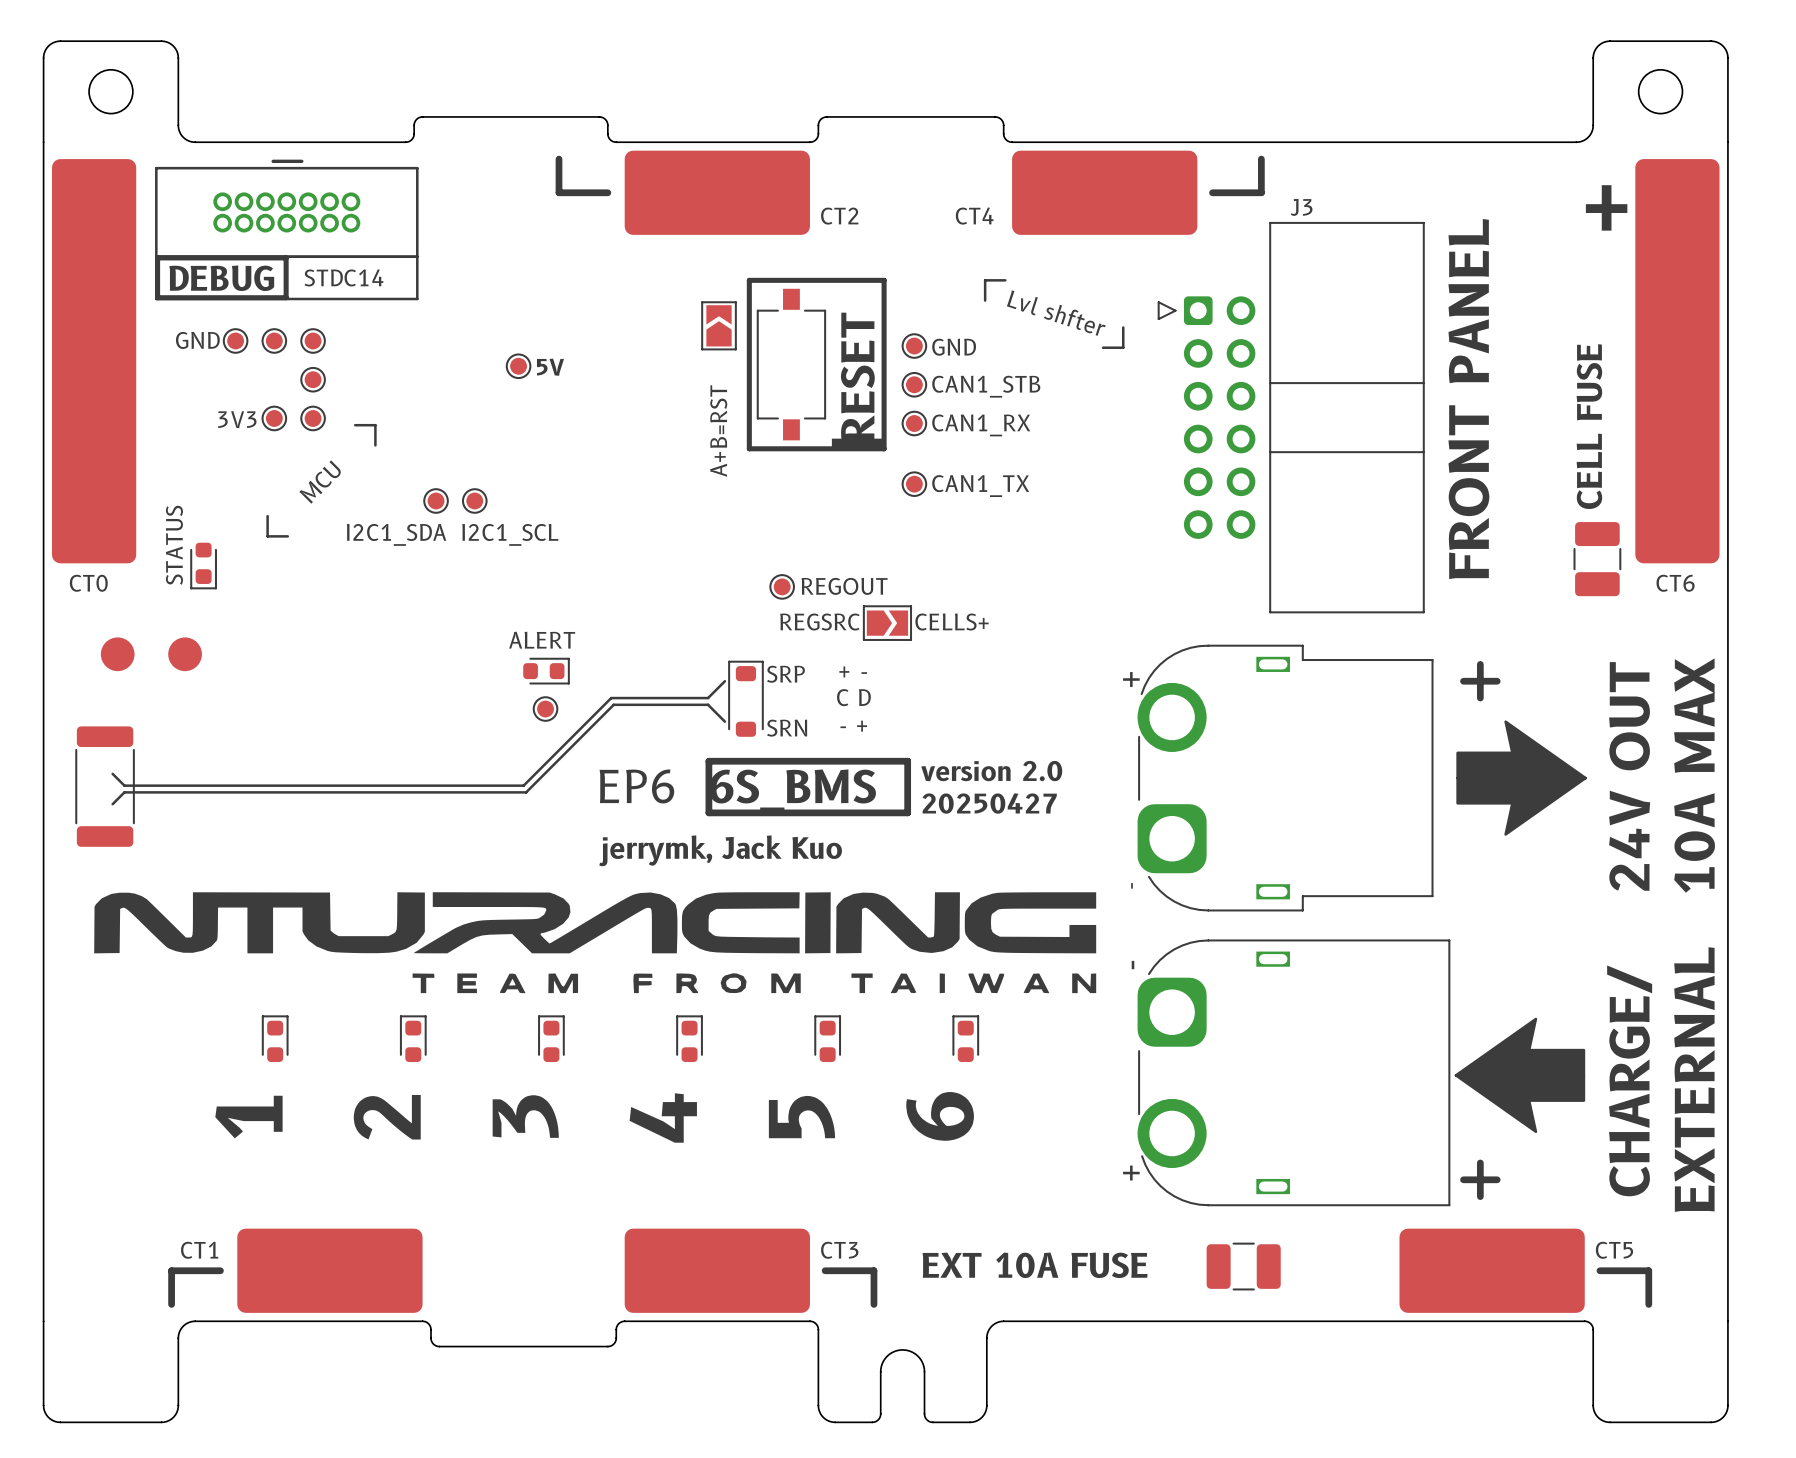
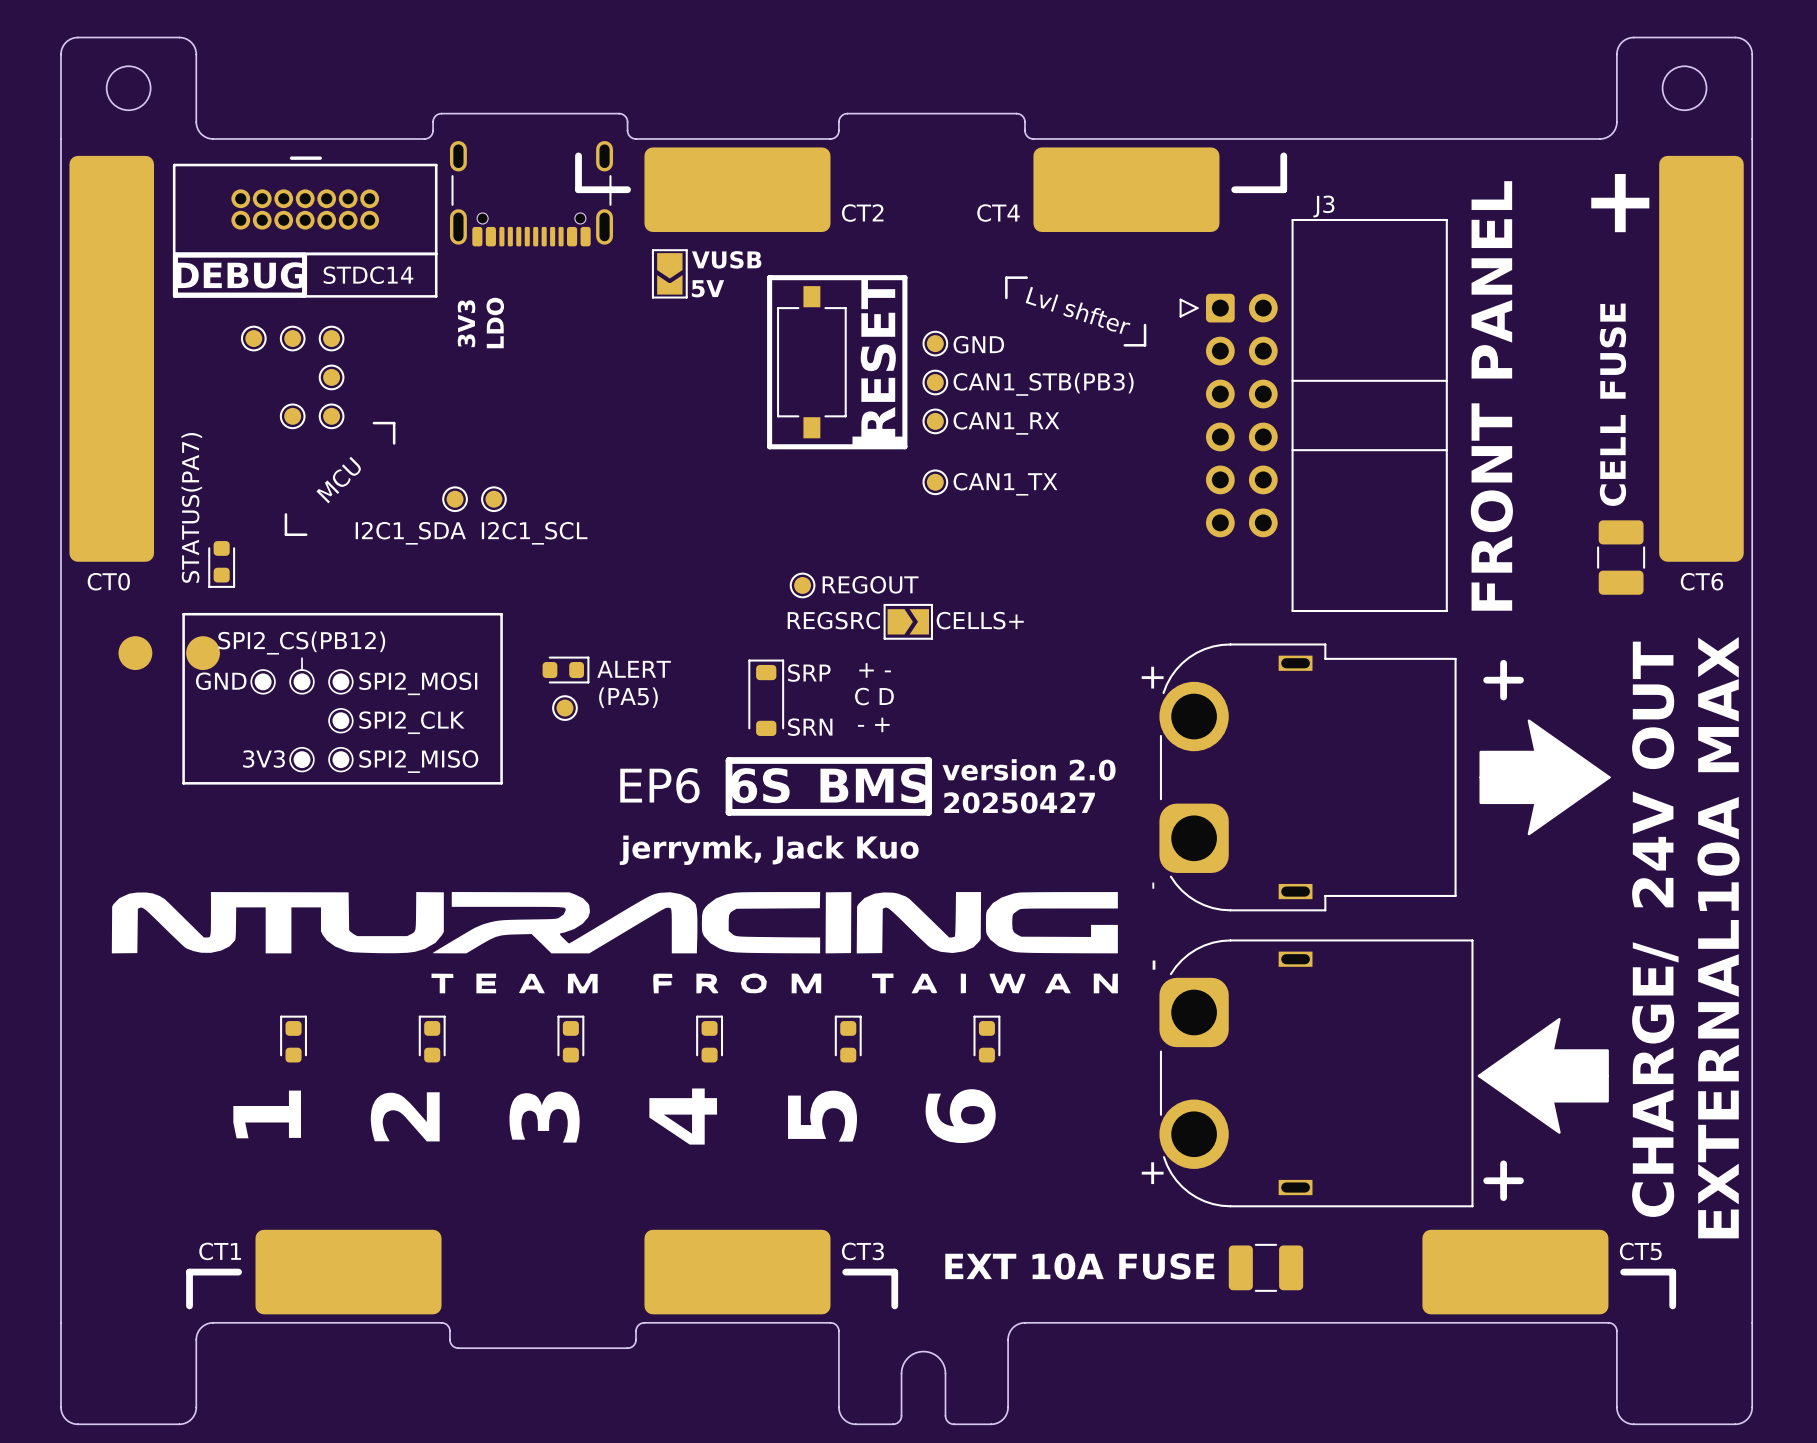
part: none -> (531, 193)
text: none -> VUSB (726, 259)
part rotation: 0° (719, 325) -> 180° (669, 273)
part position: (719, 325) -> (669, 273)
text: none -> 3V3 (466, 323)
text: none -> LDO (495, 323)
text position: GND (197, 340) -> GND (221, 681)
part: (518, 366) -> none
text position: 5V (550, 367) -> 5V (708, 288)
text: CAN1_STB (986, 386) -> CAN1_STB(PB3) (1043, 384)
text: 3V3 (237, 419) -> none
text: A+B=RST (718, 431) -> none
text: STATUS (174, 545) -> STATUS(PA7) (191, 507)
line: none -> (183, 614) (501, 614) (501, 783) (183, 783) (183, 614)
text position: ALERT (542, 640) -> ALERT (634, 669)
text: none -> SPI2_CS(PB12) (301, 643)
line: none -> (301, 658) (301, 670)
drawing: none -> [250, 669, 354, 773]
line: (724, 681) (708, 698) (611, 698) (523, 785) (124, 785) (112, 773) -> none
text: none -> SPI2_MOSI (418, 683)
text: none -> (PA5) (628, 697)
line: (724, 721) (708, 704) (613, 704) (526, 792) (124, 792) (112, 804) -> none
text: none -> SPI2_CLK (411, 722)
text: none -> 3V3 (264, 759)
text: none -> SPI2_MISO (418, 761)
part: (105, 786) -> none

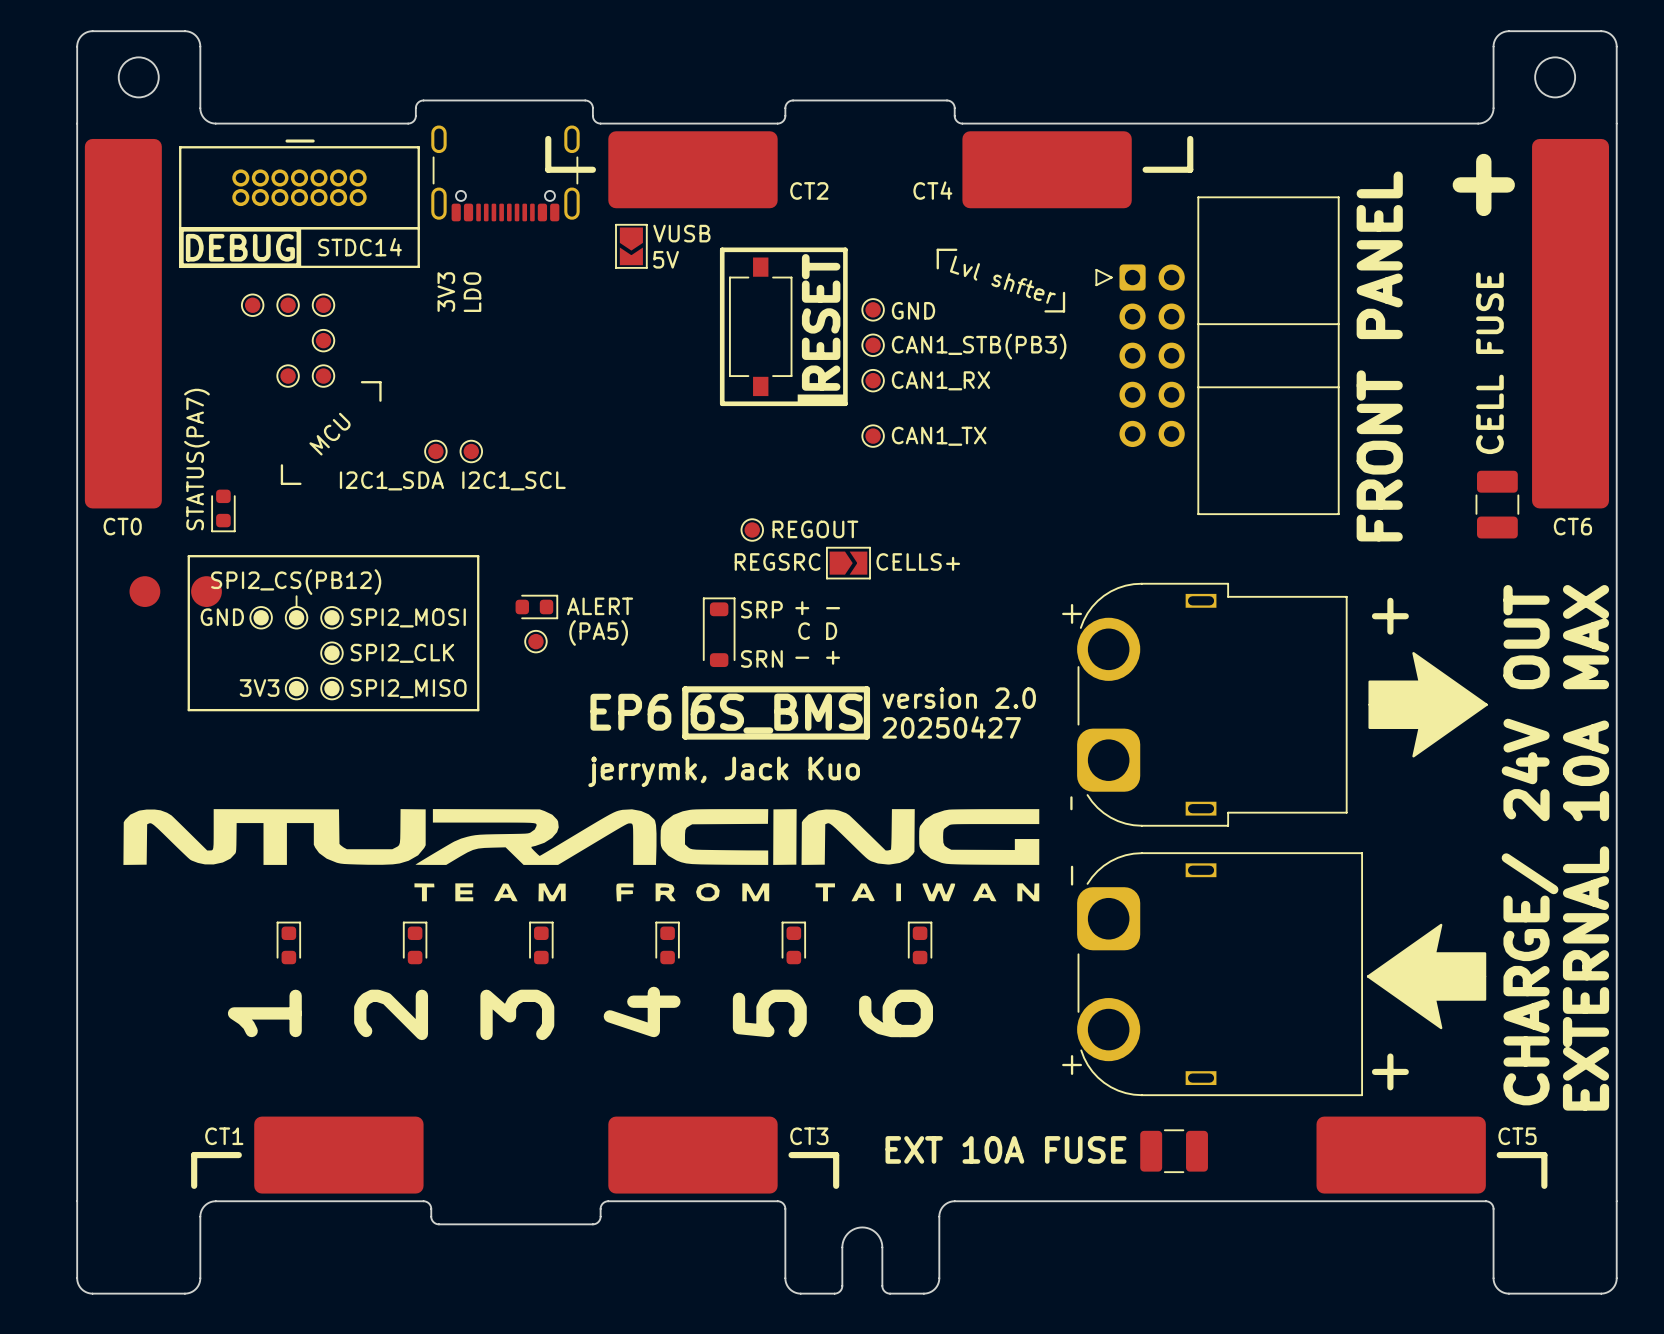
part: none -> (1217, 355)
J3: (1313, 415) -> none

